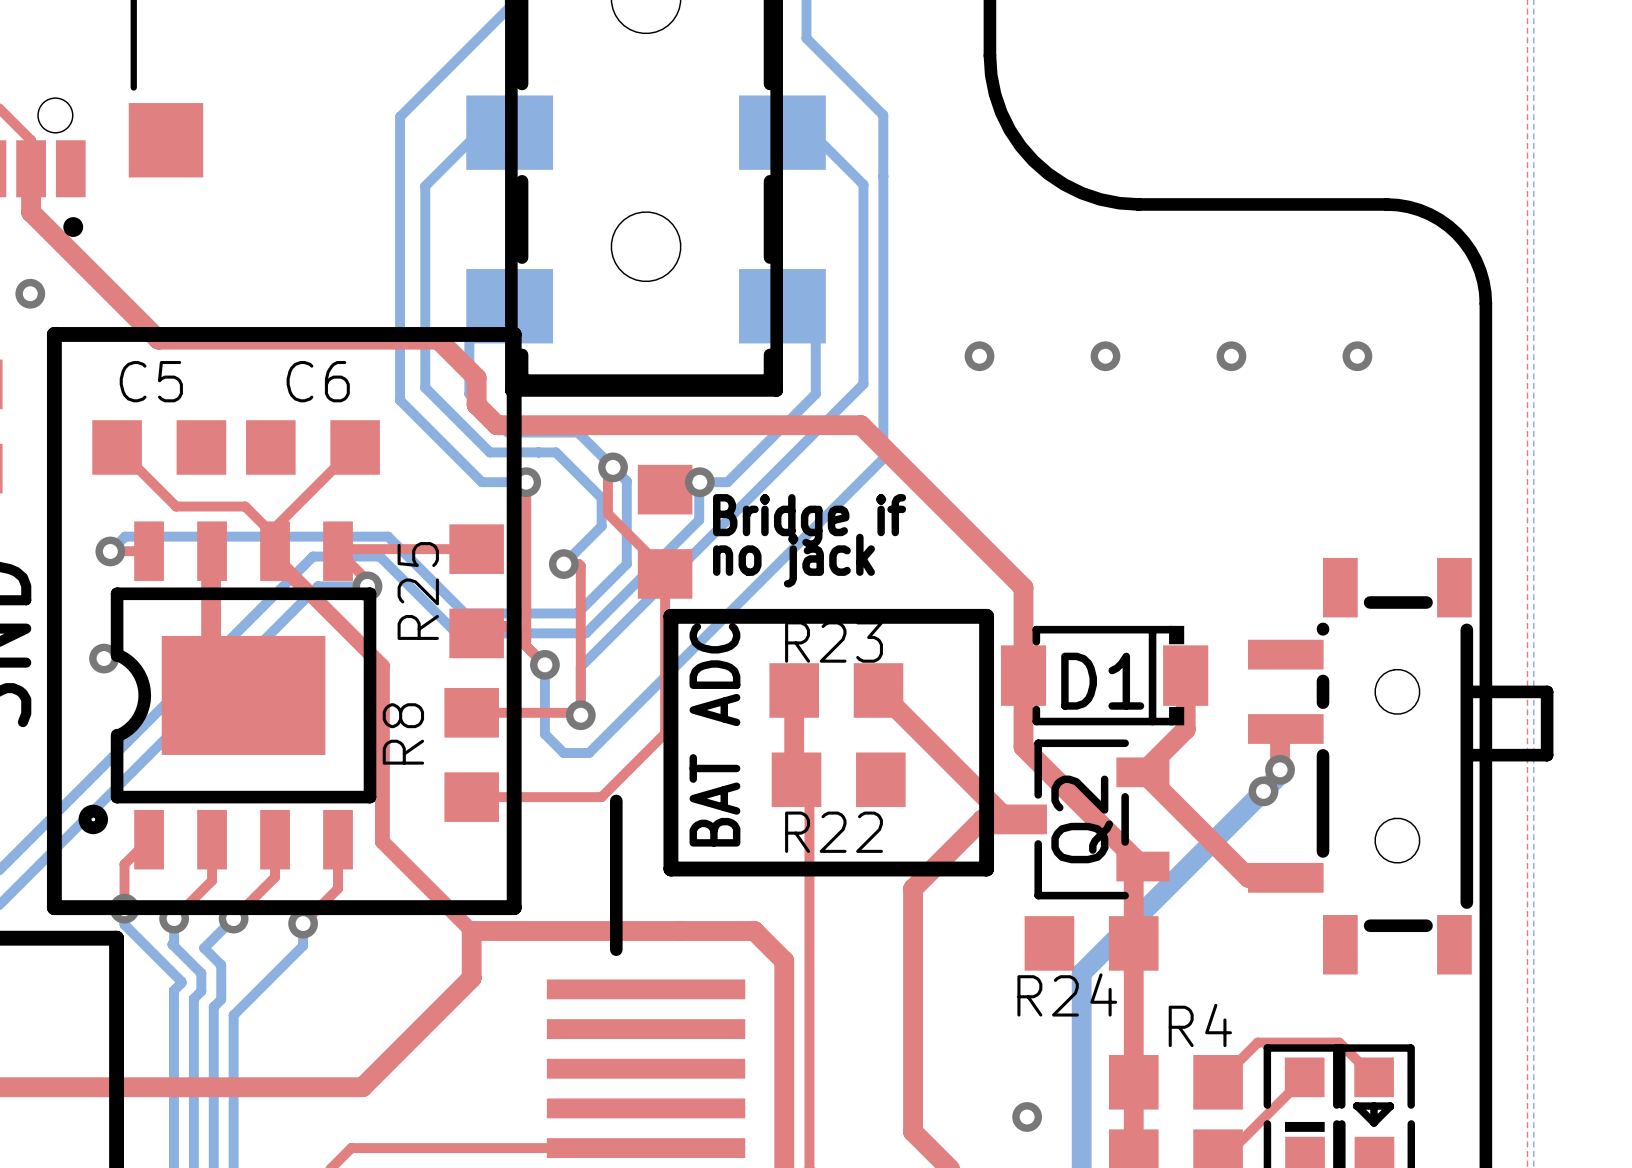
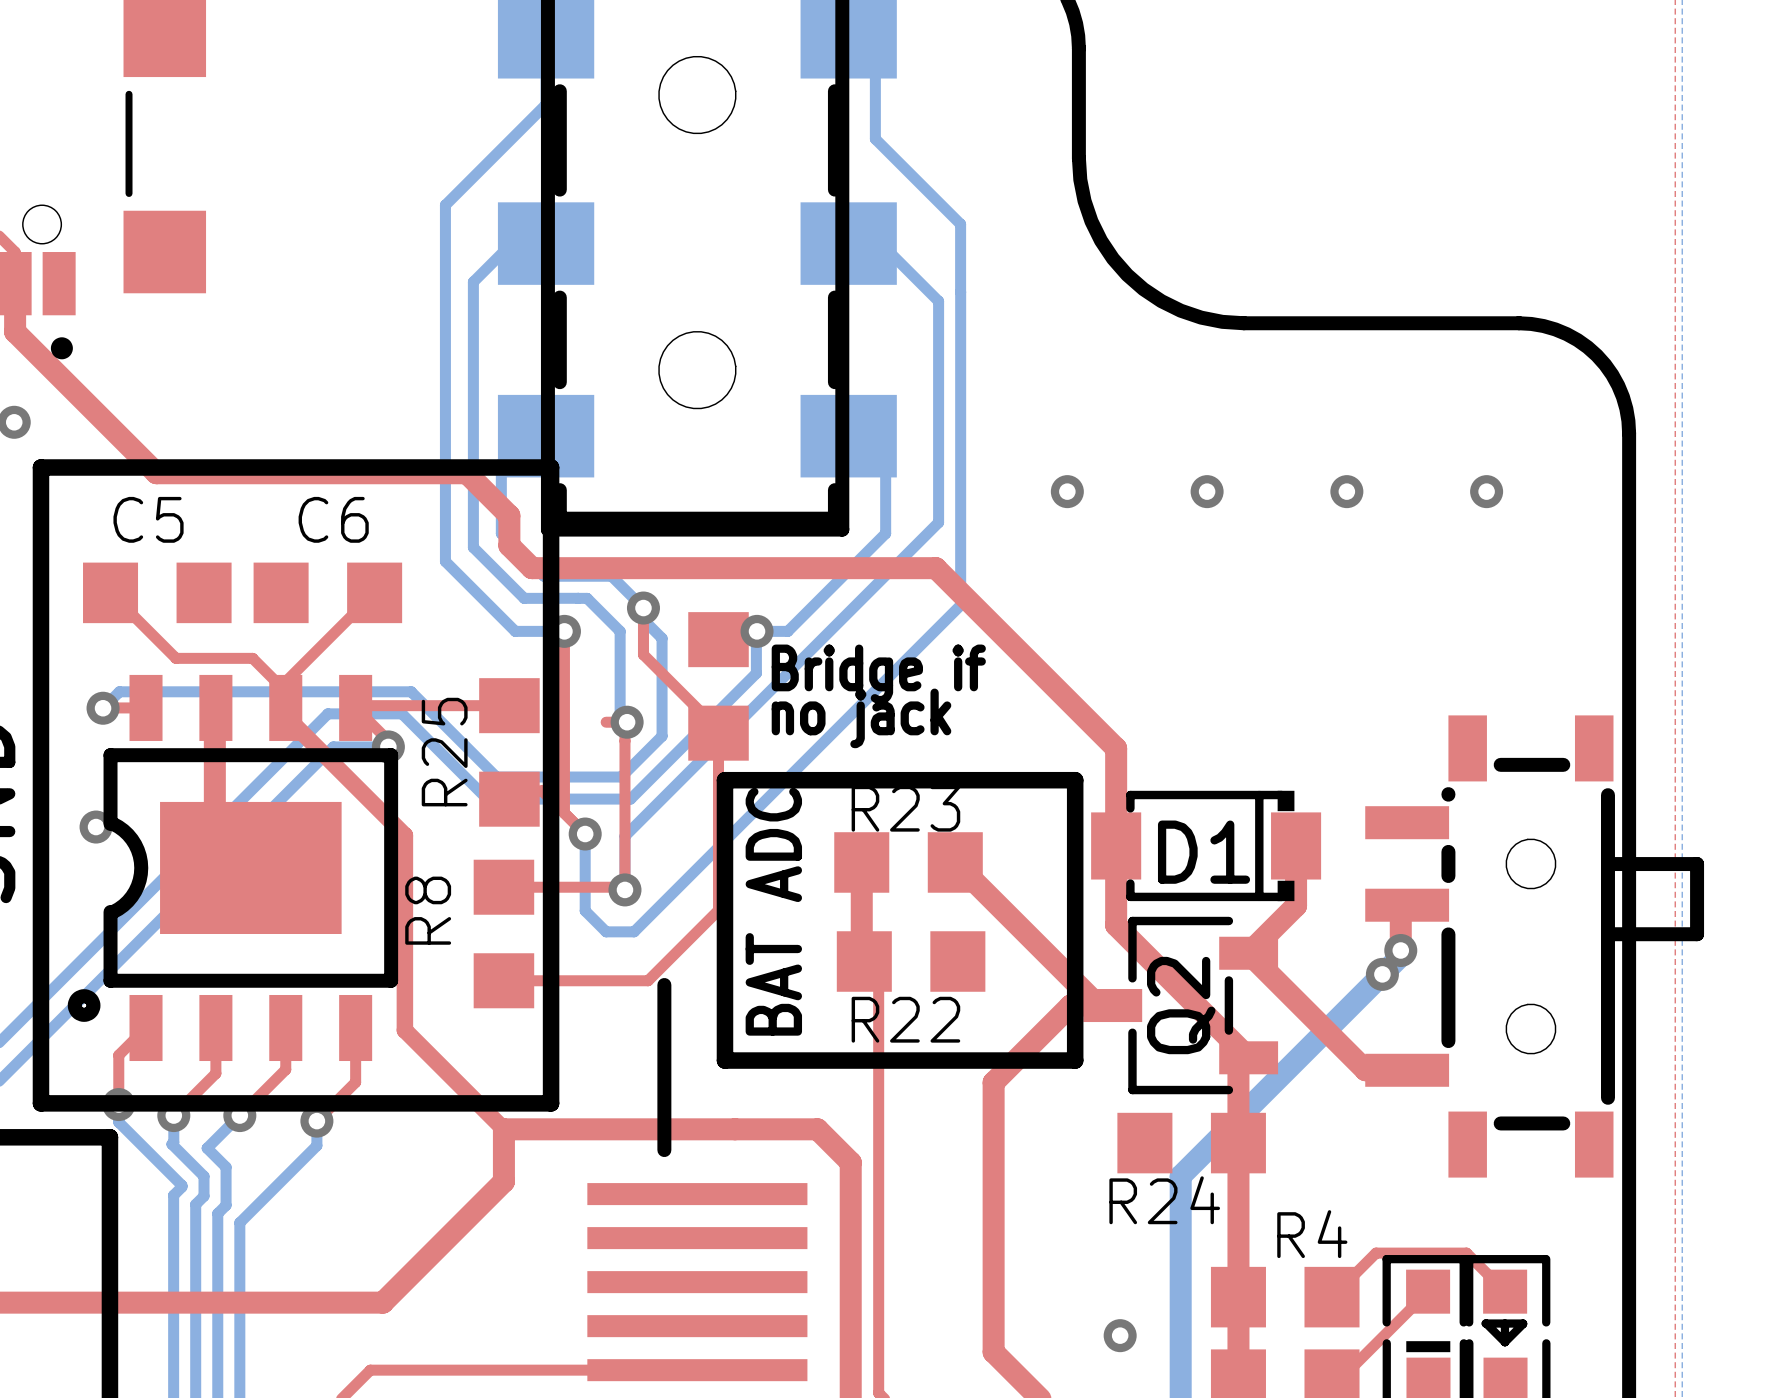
bottom track: (418, 97) (400, 116) (400, 400) (418, 419) -> (445, 205) (445, 561)
bottom track: (444, 167) (425, 186) (425, 387) (444, 406) -> (473, 281) (473, 547)
bottom track: (568, 432) (578, 432) (626, 481) (626, 564) (614, 576) -> (611, 576) (643, 608) (643, 619) (662, 638) (662, 736)
bottom track: (546, 452) (555, 452) (601, 498) (601, 526) (563, 564) -> (587, 598) (620, 631) (620, 715) (627, 722)
top track: (613, 467) (607, 472) (607, 513) -> (643, 608) (643, 654) (655, 666)
via position: (613, 467) -> (643, 608)
via position: (563, 564) -> (627, 722)

